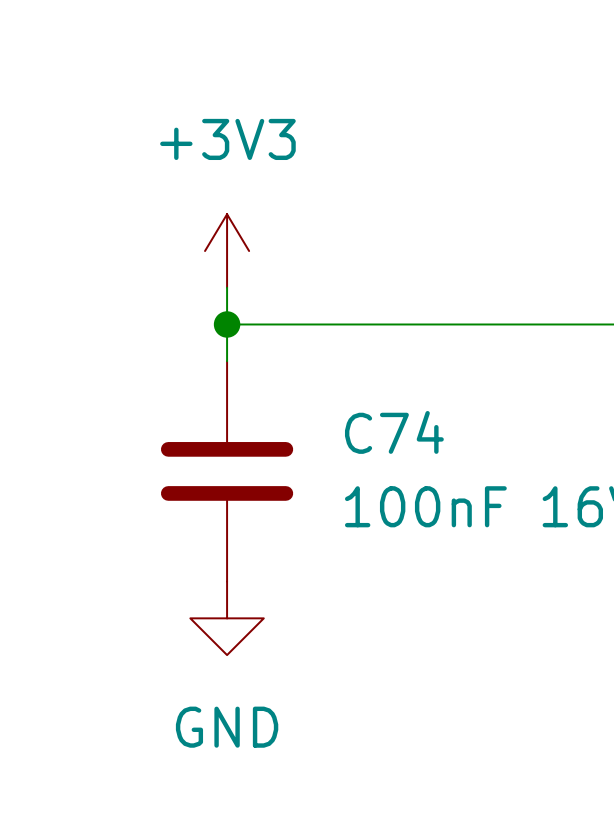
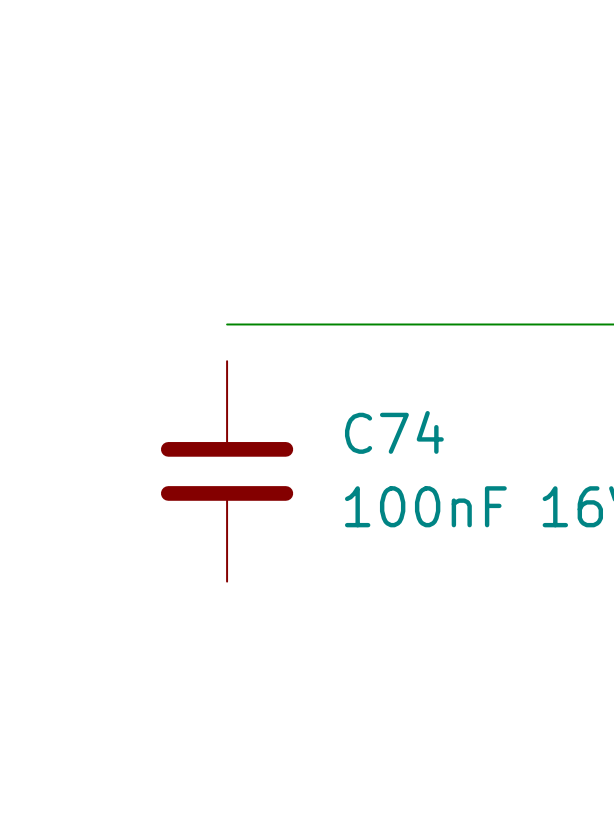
power symbol: +3V3 (227, 251) -> none
wire: (227, 287) (227, 361) -> none
junction: (227, 324) -> none
power symbol: GND (227, 618) -> none

